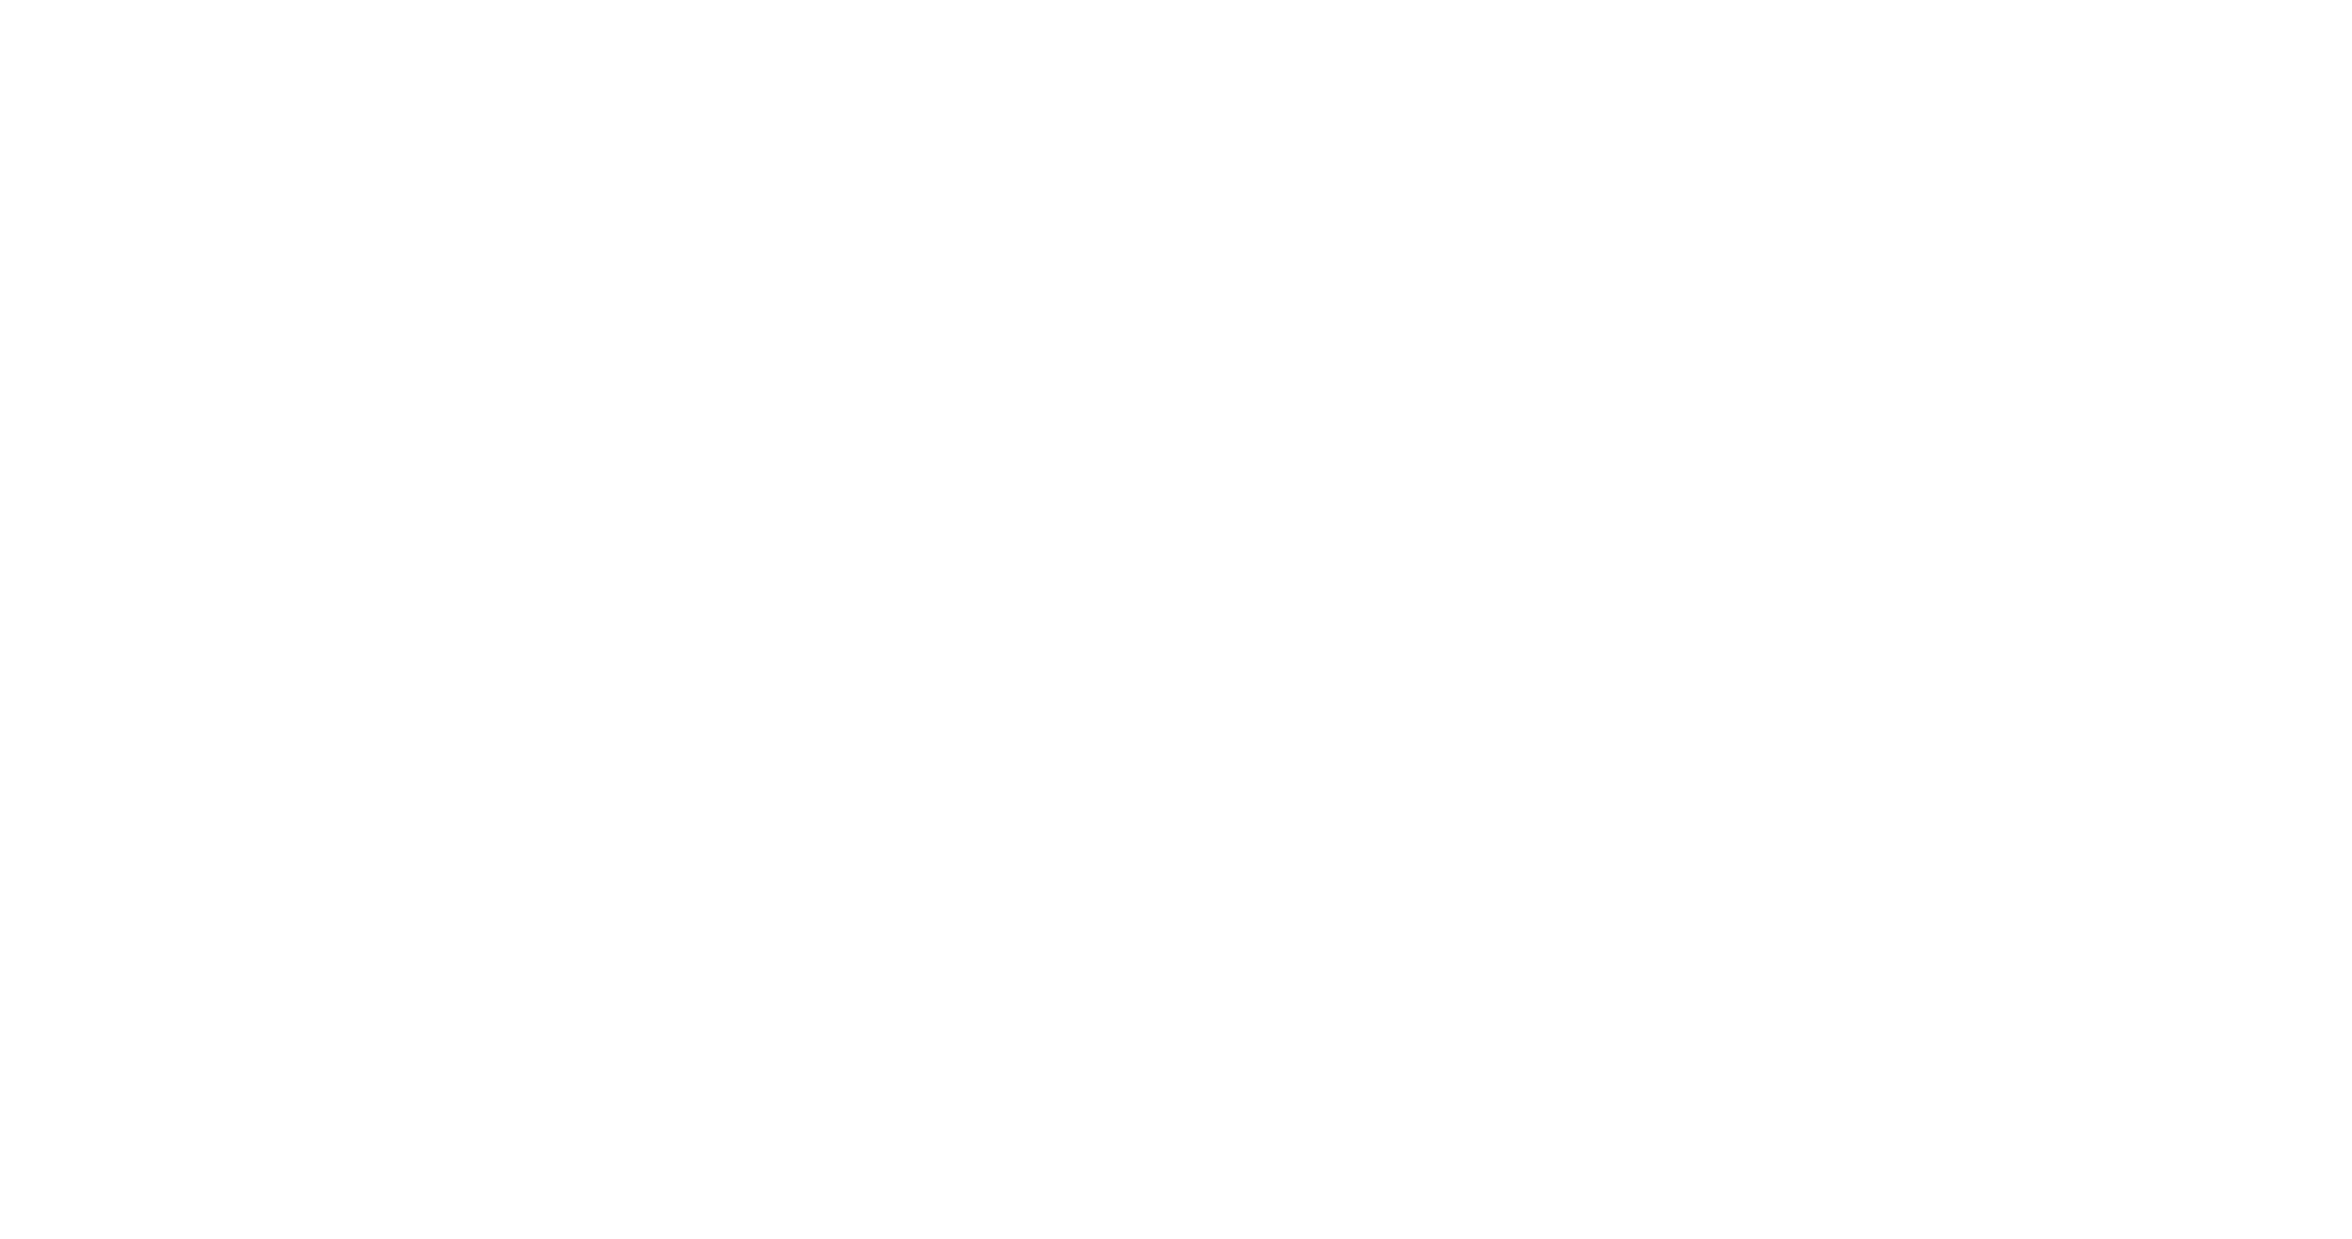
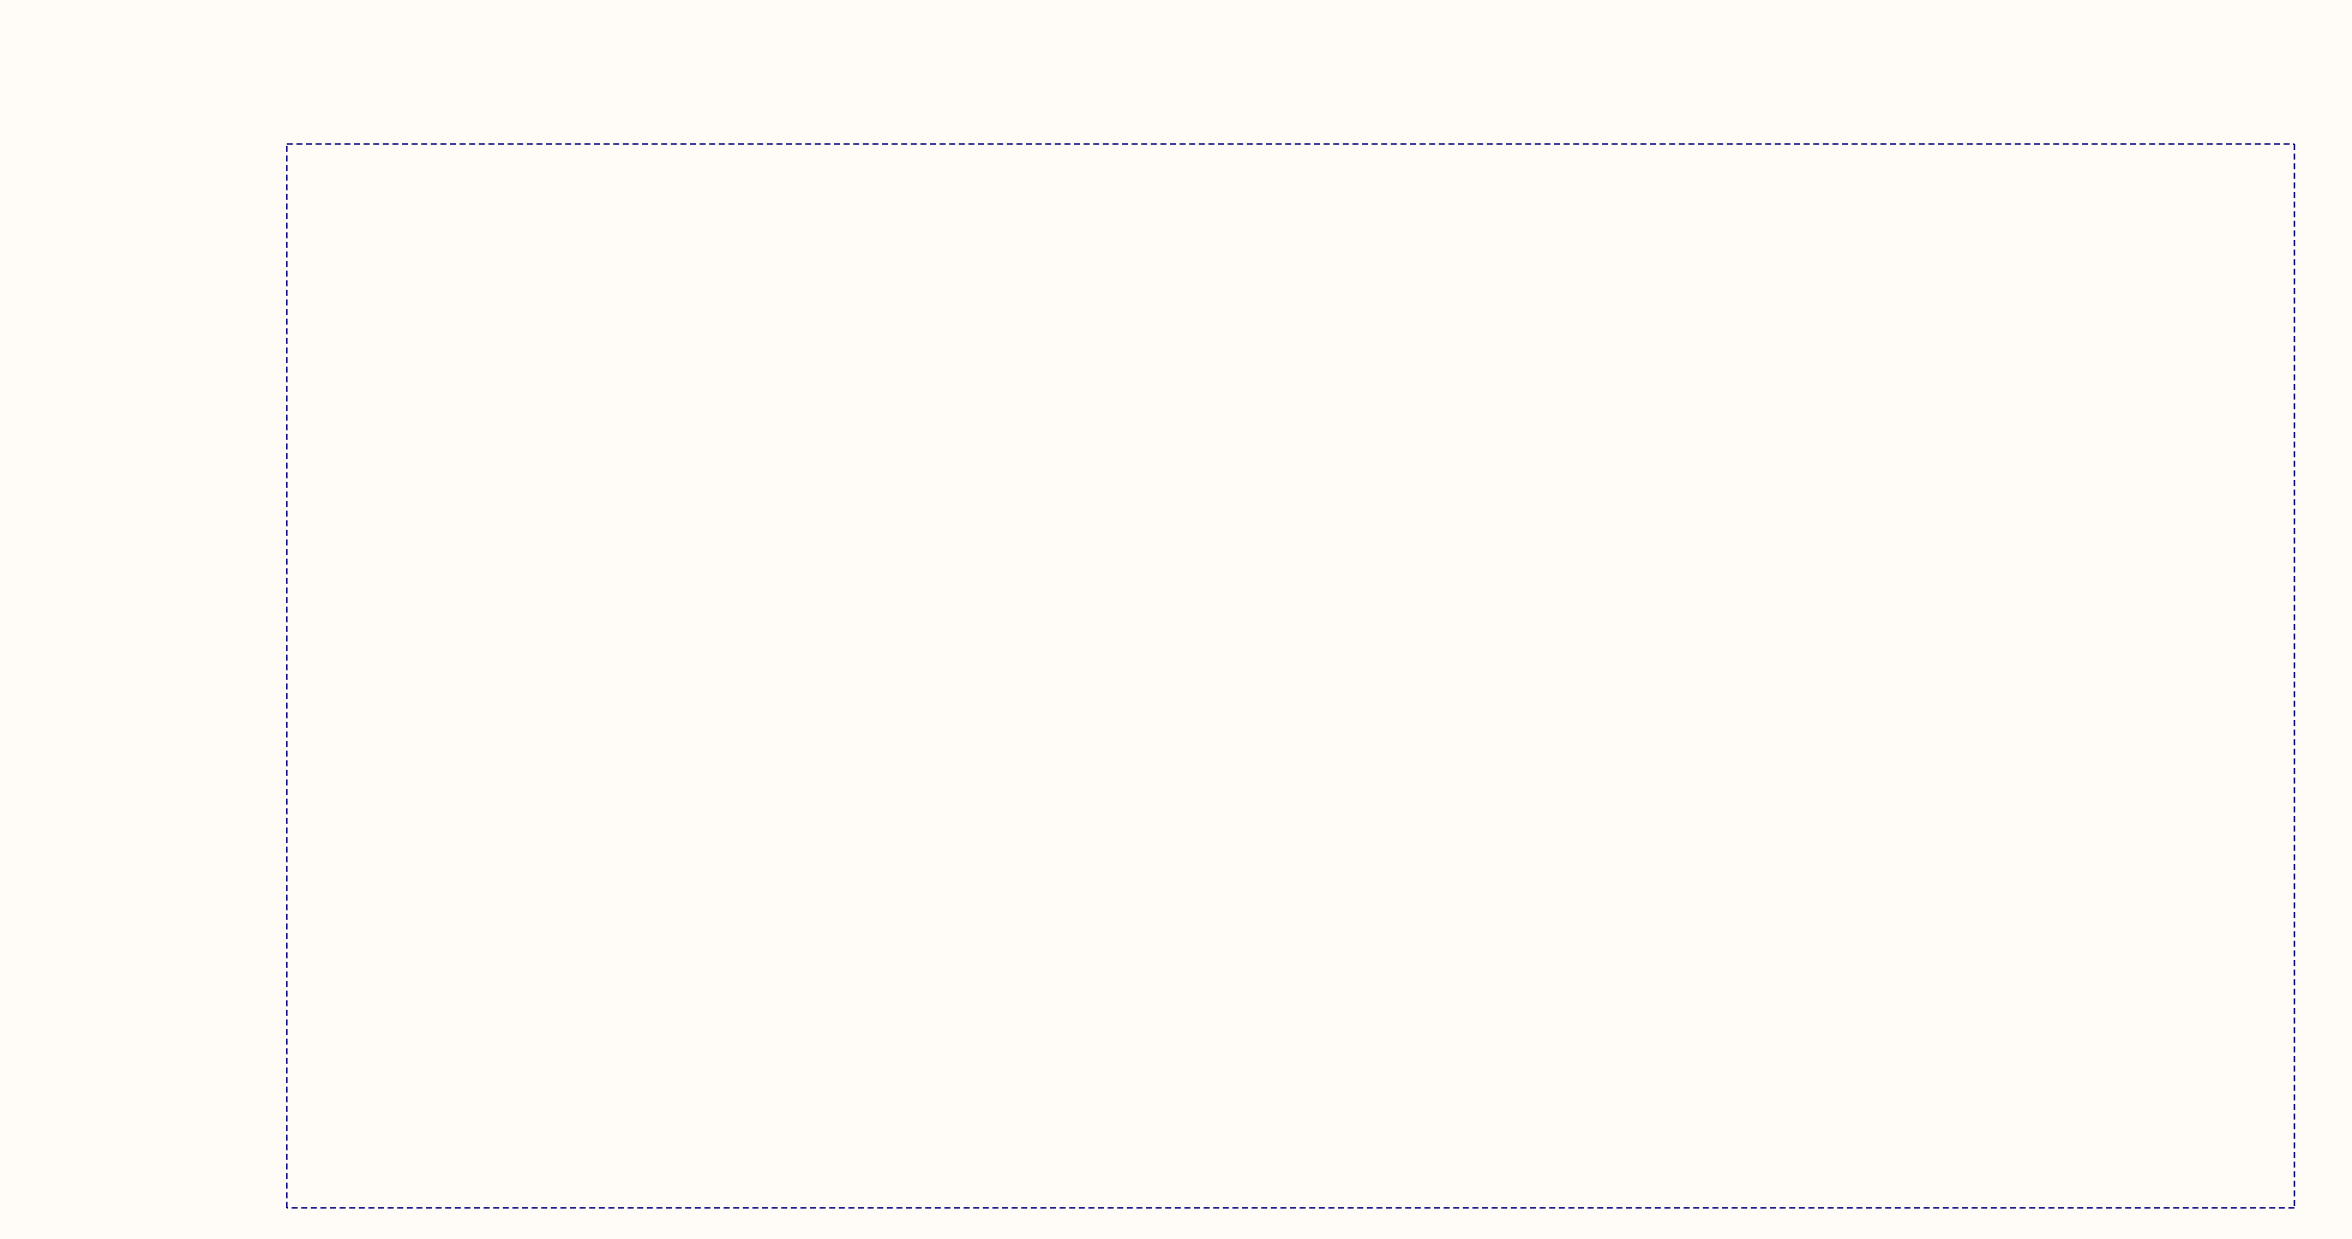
line: none -> (286, 144) (286, 1207) (2294, 1207) (2294, 144) (286, 144)

